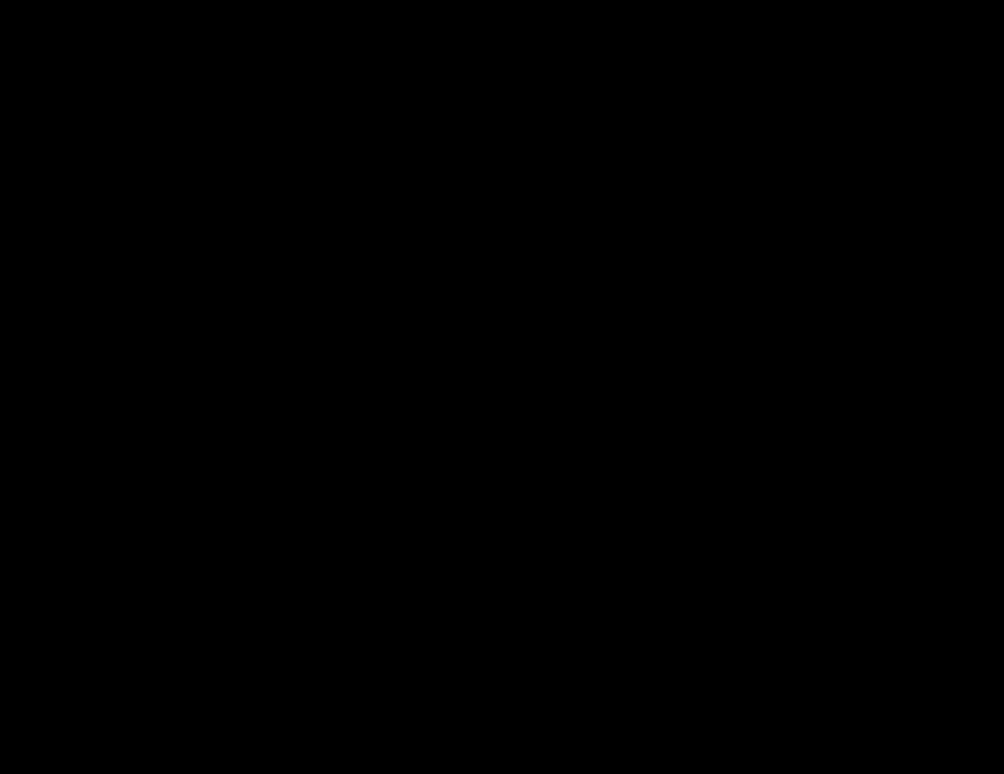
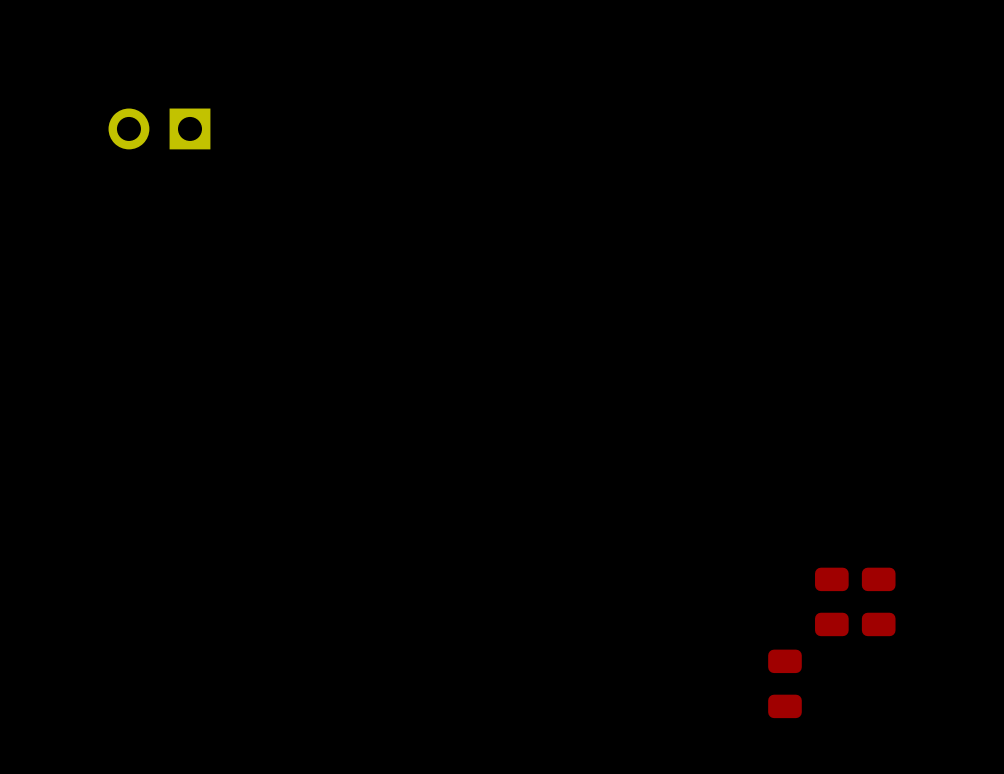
part: none -> (159, 128)
part: none -> (831, 601)
part: none -> (878, 601)
part: none -> (784, 683)

